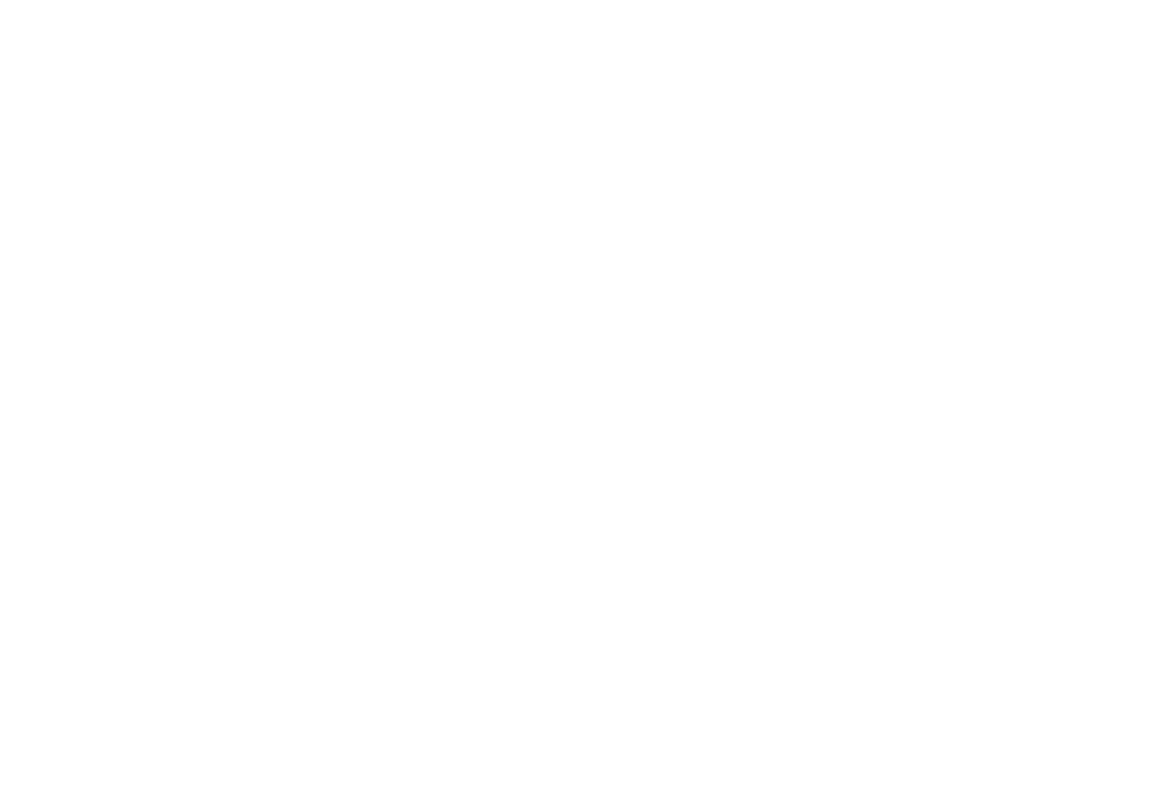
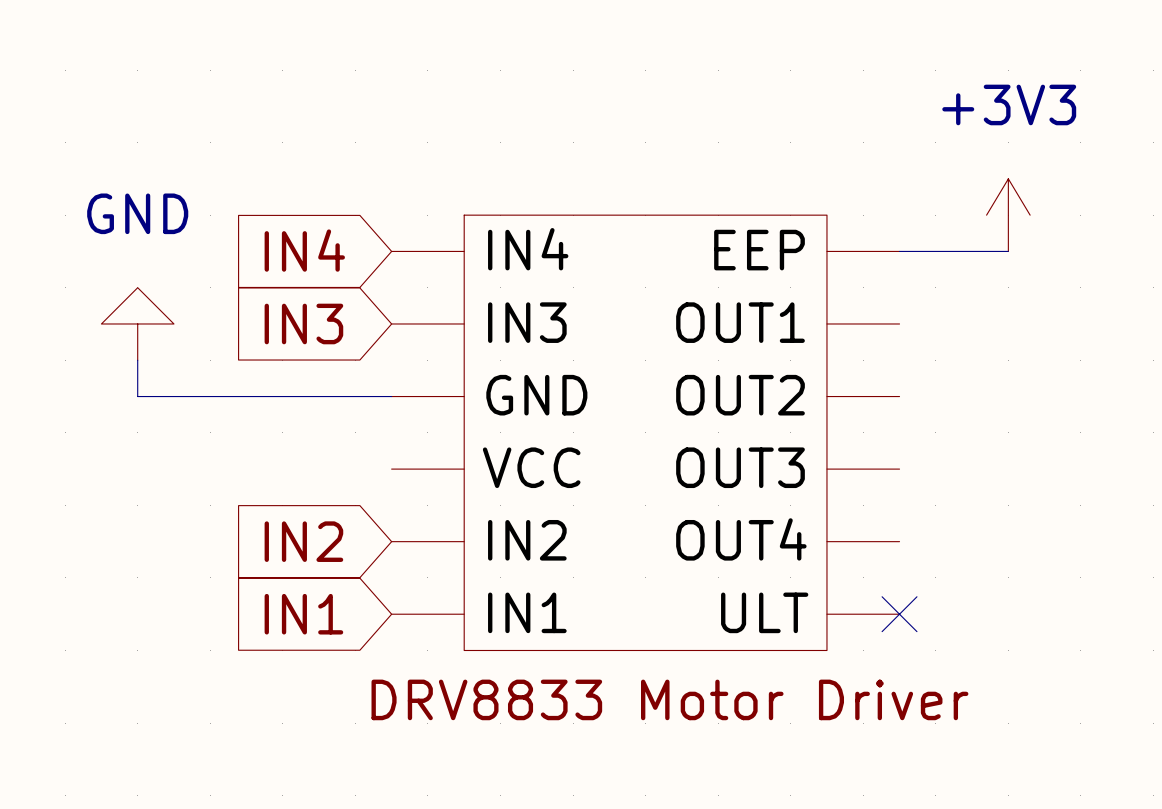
power symbol: none -> +3V3 (1008, 215)
global label: none -> IN4 (304, 250)
wire: none -> (899, 251) (1008, 251)
power symbol: none -> GND (137, 323)
global label: none -> IN3 (303, 323)
wire: none -> (137, 360) (137, 396) (391, 396)
part: none -> (645, 432)
global label: none -> IN2 (303, 541)
global label: none -> IN1 (303, 614)
no-connect mark: none -> (899, 614)

